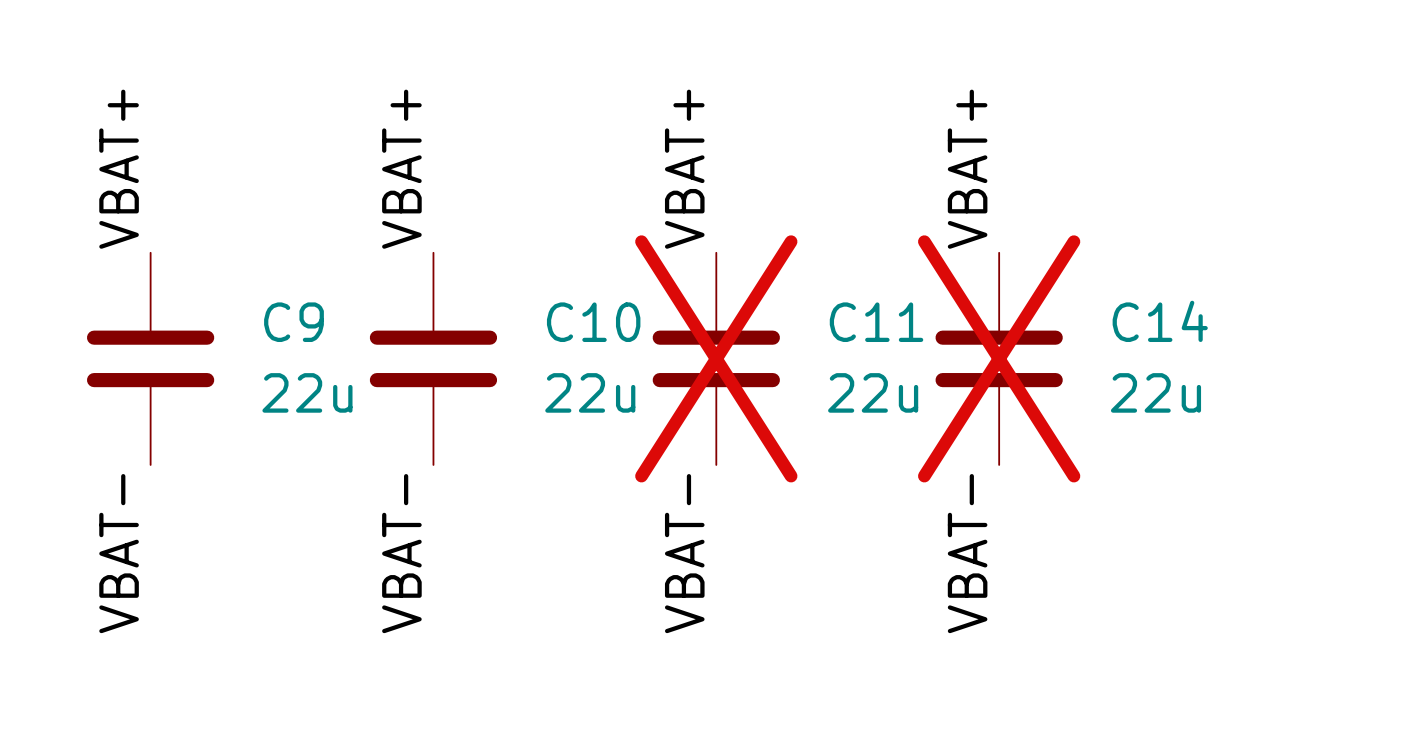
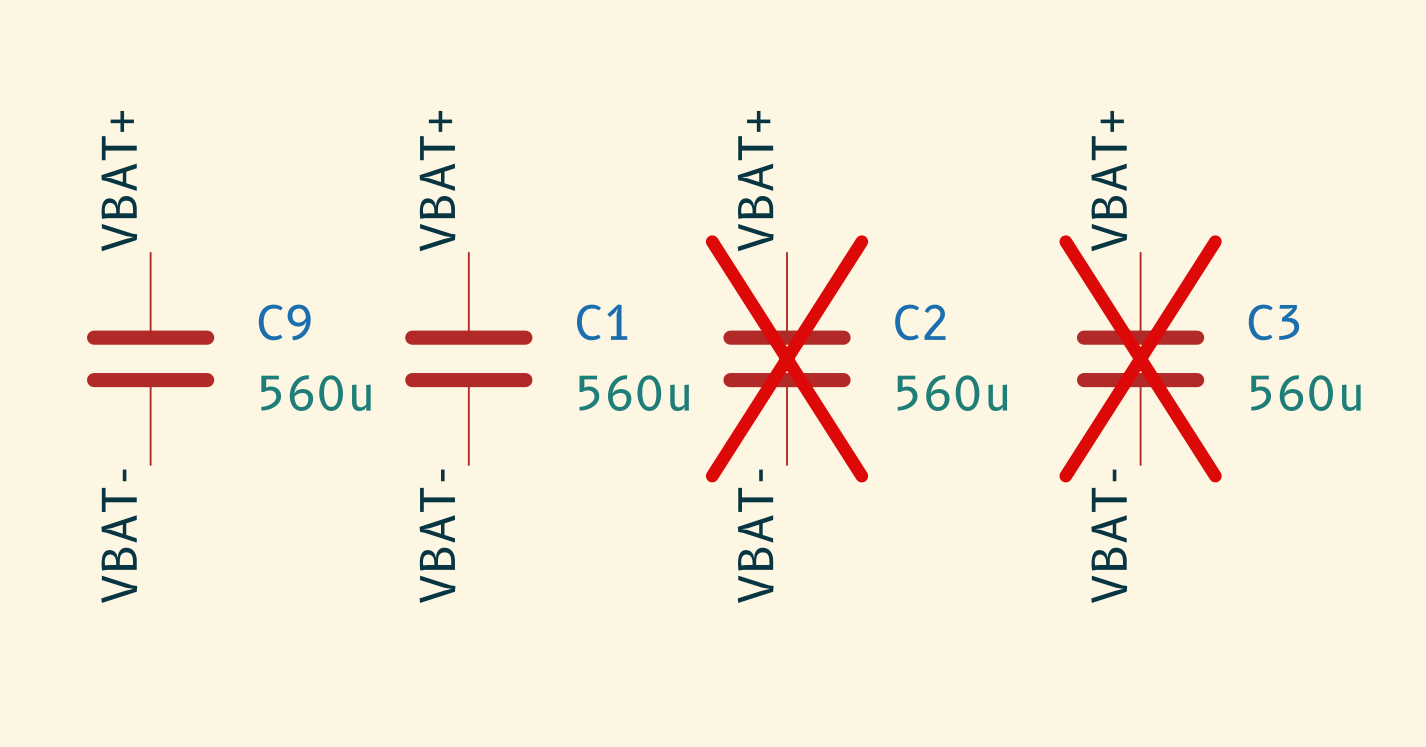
label position: VBAT+ (401, 169) -> VBAT+ (437, 181)
label position: VBAT+ (684, 169) -> VBAT+ (755, 181)
label: VBAT+ (967, 169) -> none
label: none -> VBAT+ (1109, 181)
C10: 22u (433, 358) -> none
C1: none -> 560u (468, 358)
C11: 22u (716, 358) -> none
C2: none -> 560u (787, 358)
C14: 22u (999, 358) -> none
C3: none -> 560u (1140, 358)
C9 value: 22u (307, 392) -> 560u (315, 393)
label position: VBAT- (401, 553) -> VBAT- (437, 536)
label position: VBAT- (684, 553) -> VBAT- (755, 536)
label: VBAT- (967, 553) -> none
label: none -> VBAT- (1109, 536)

